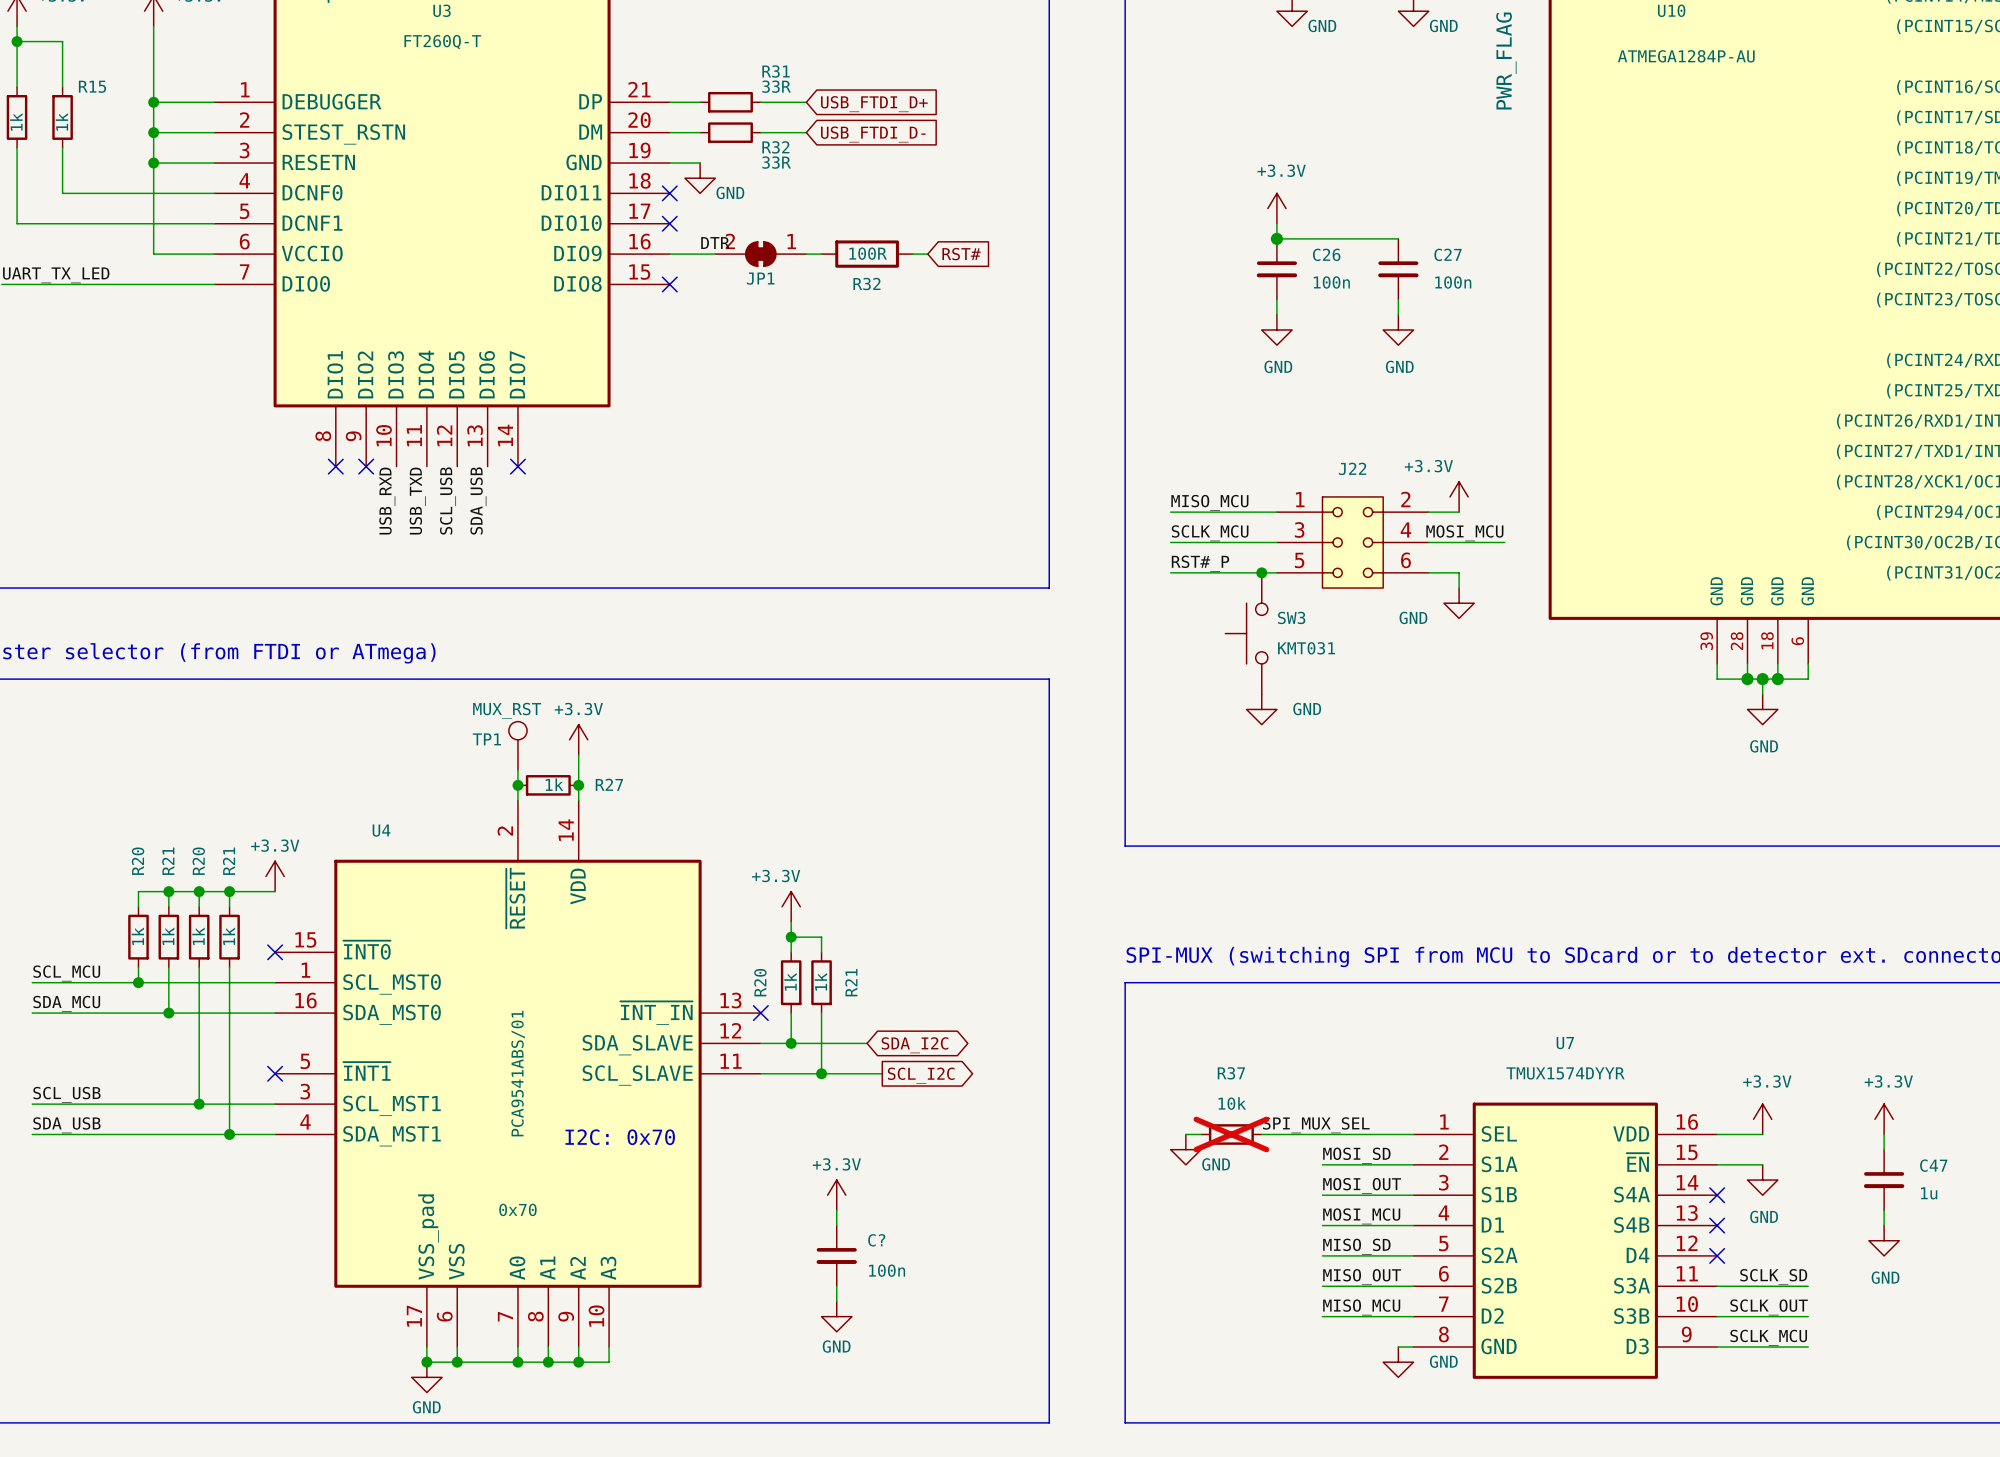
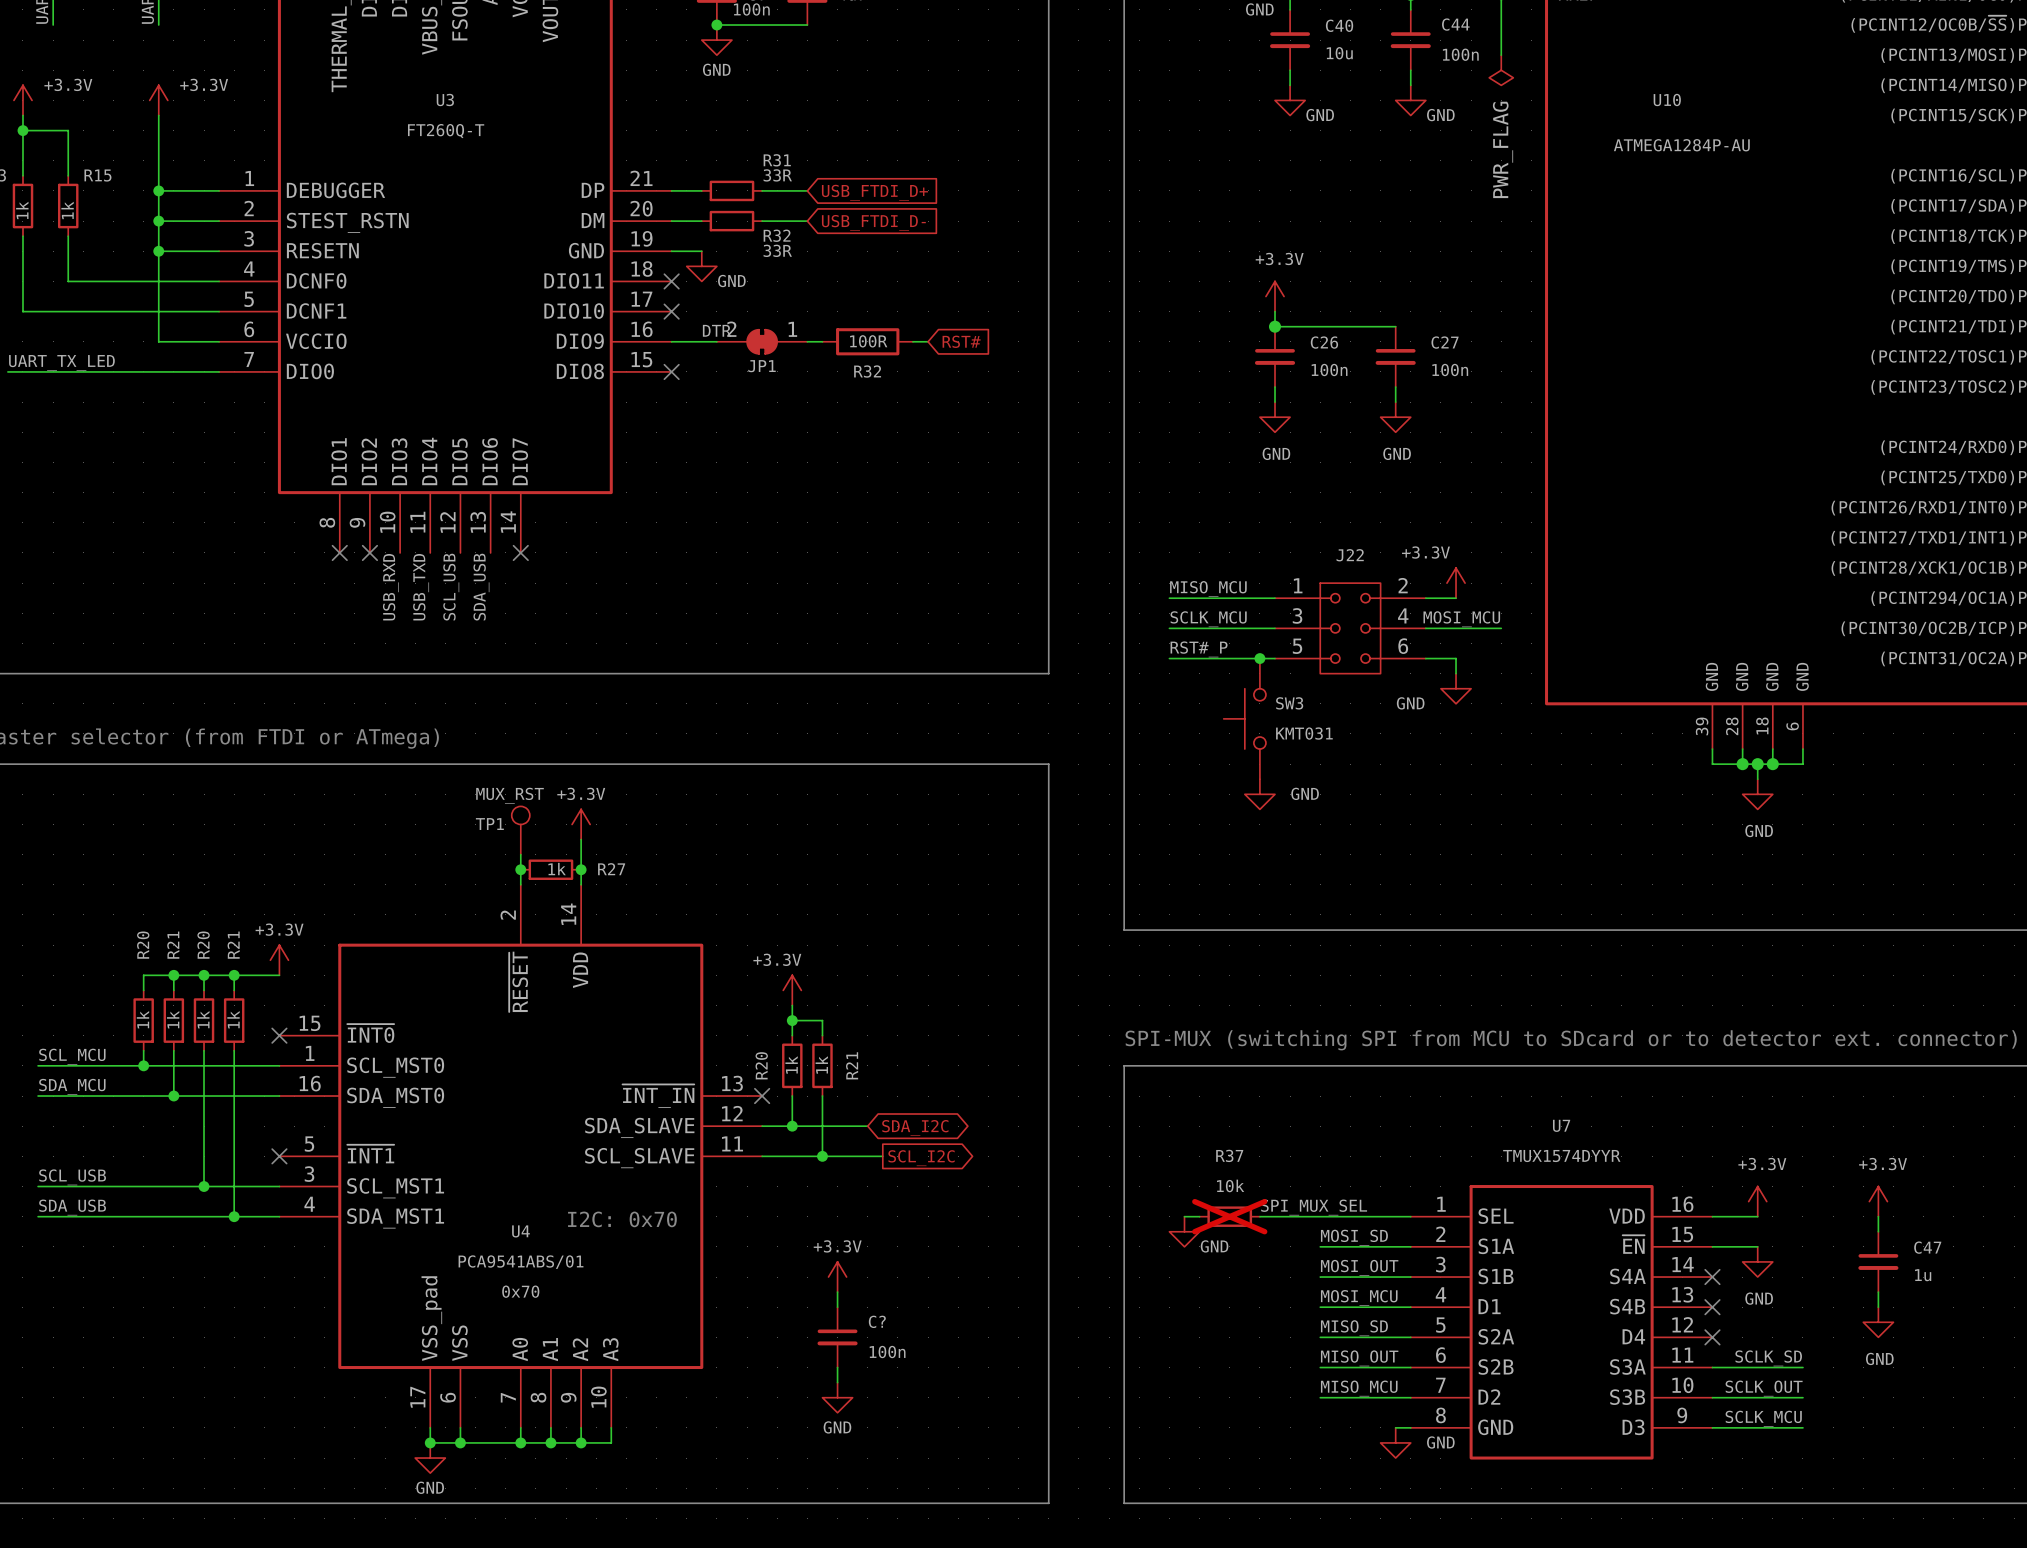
U4 name position: U4 (381, 830) -> U4 (520, 1231)
U4 value rotation: 0° (518, 1073) -> 90° clockwise (521, 1262)

